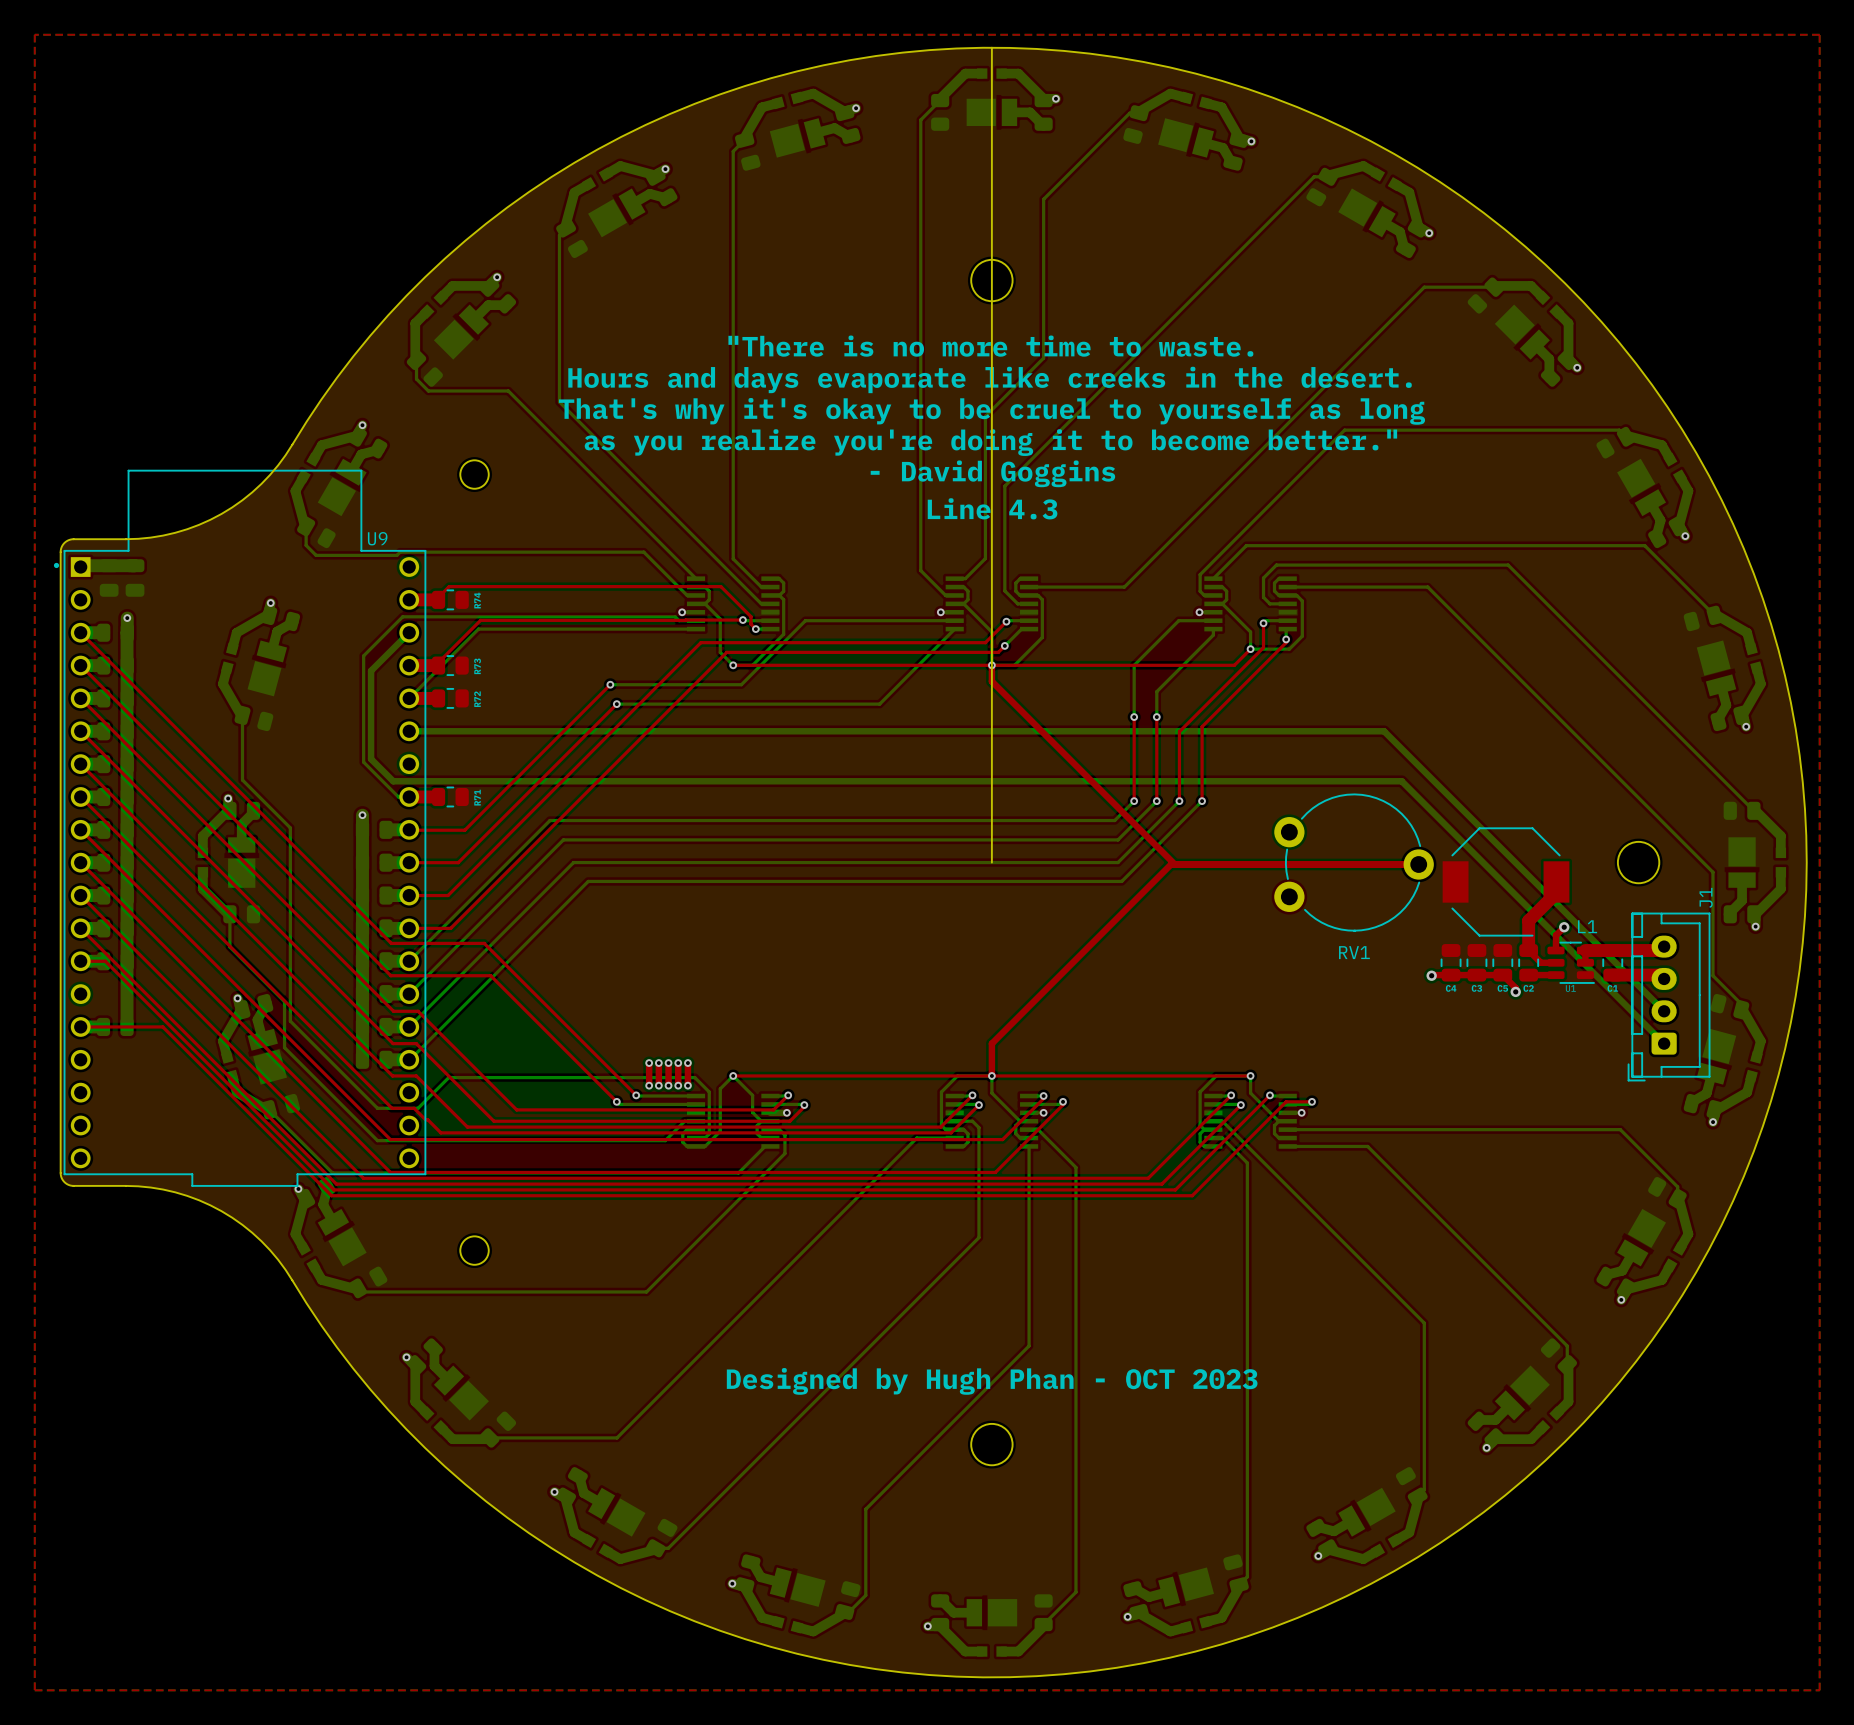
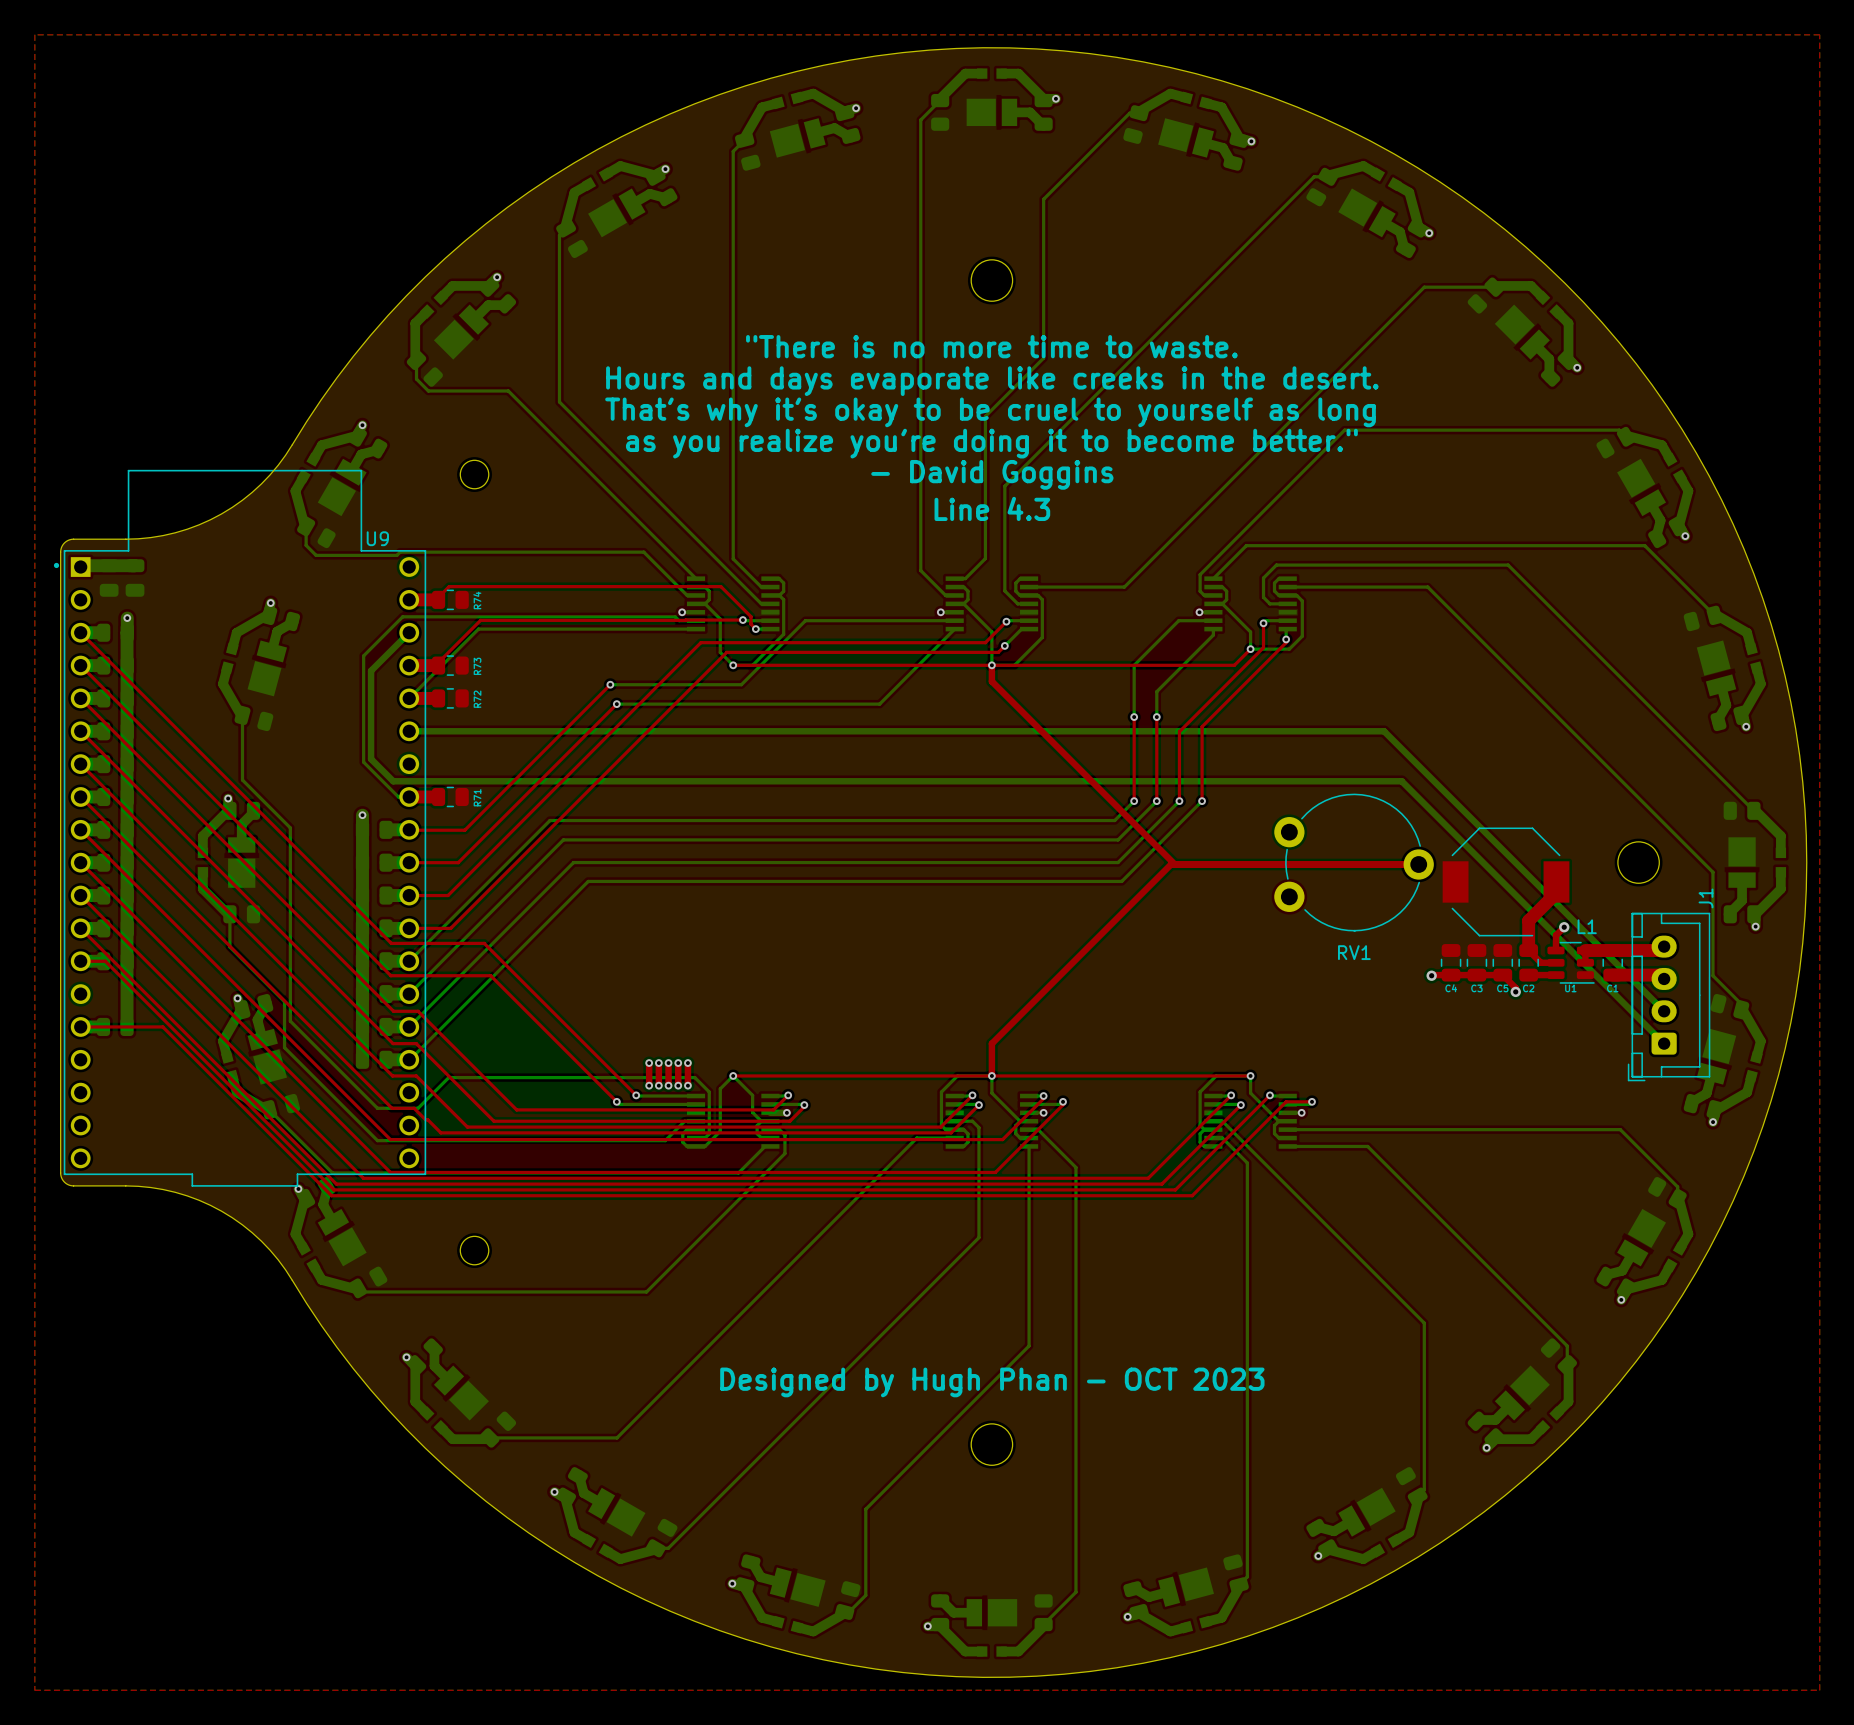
board edge: (991, 47) (991, 862) -> none

